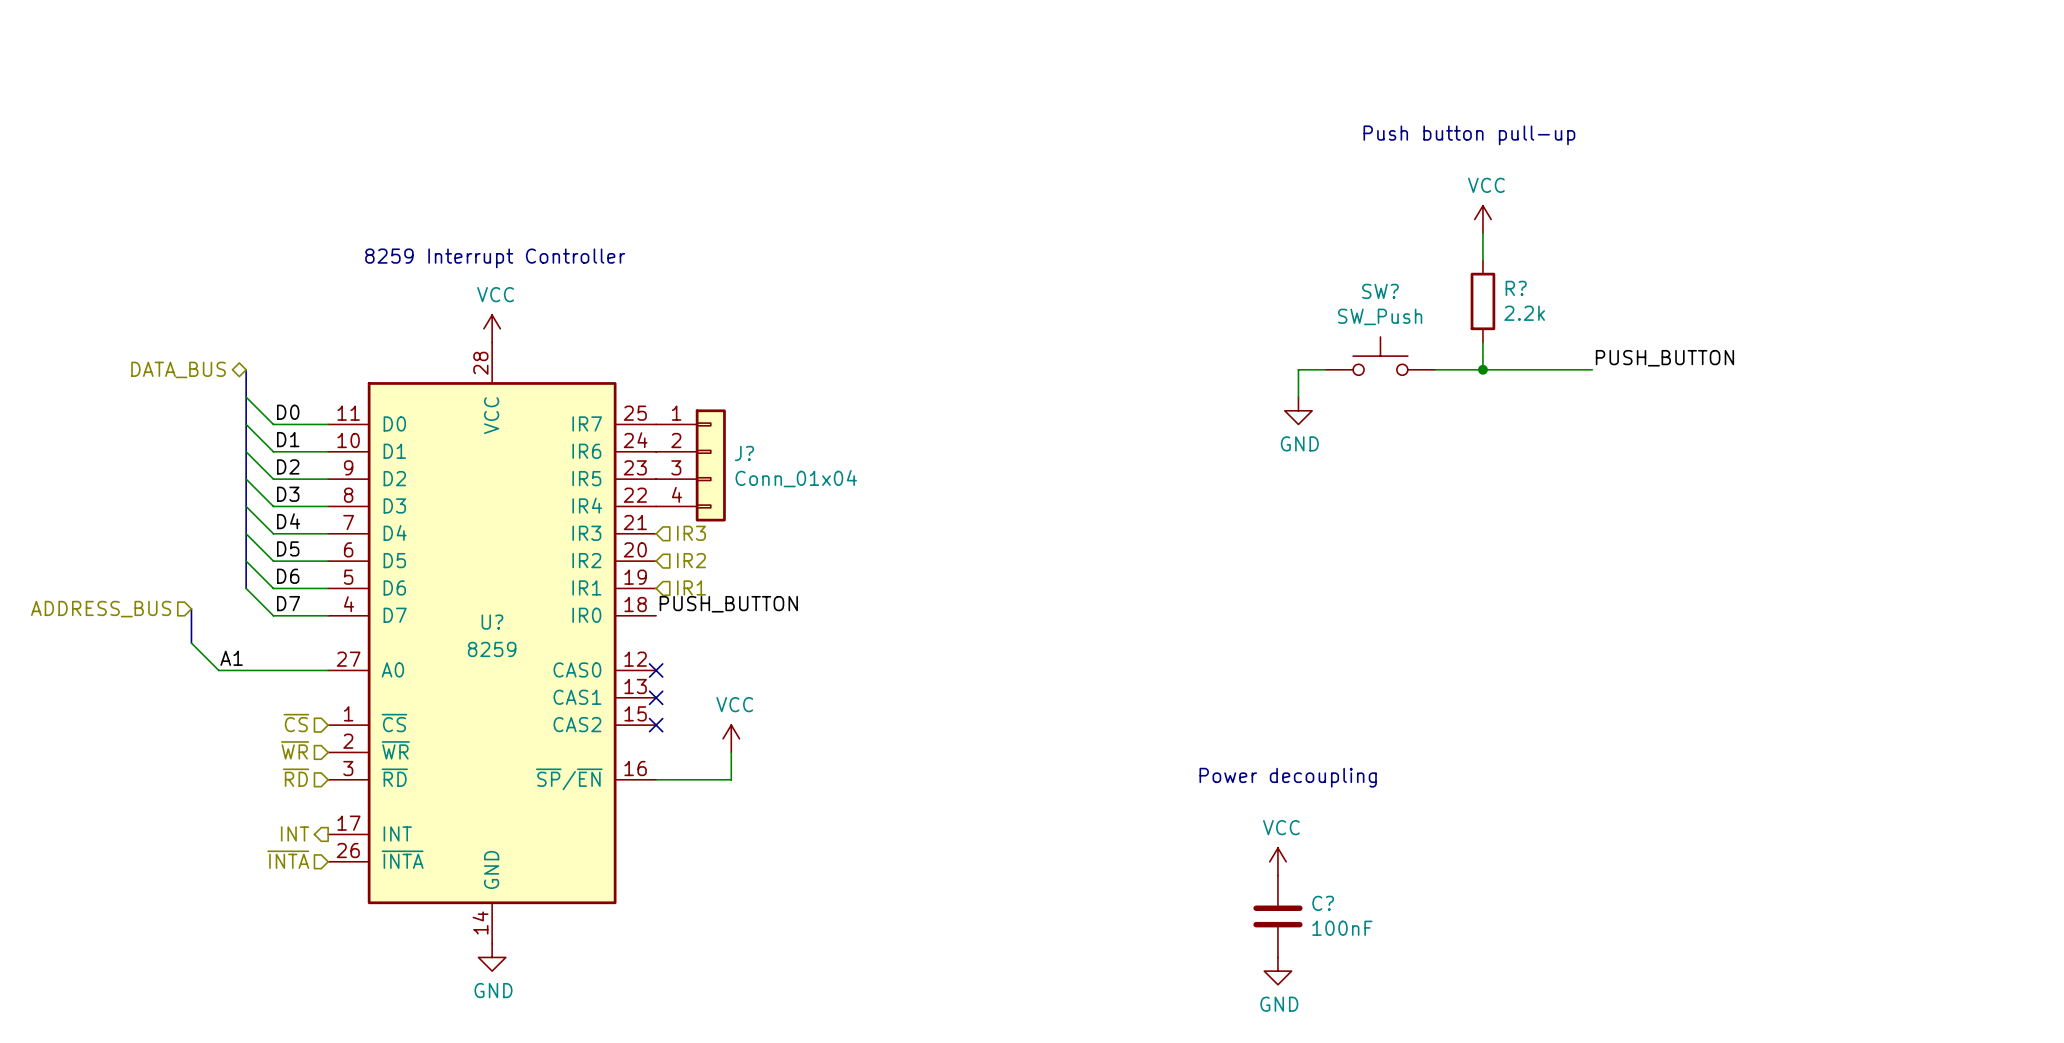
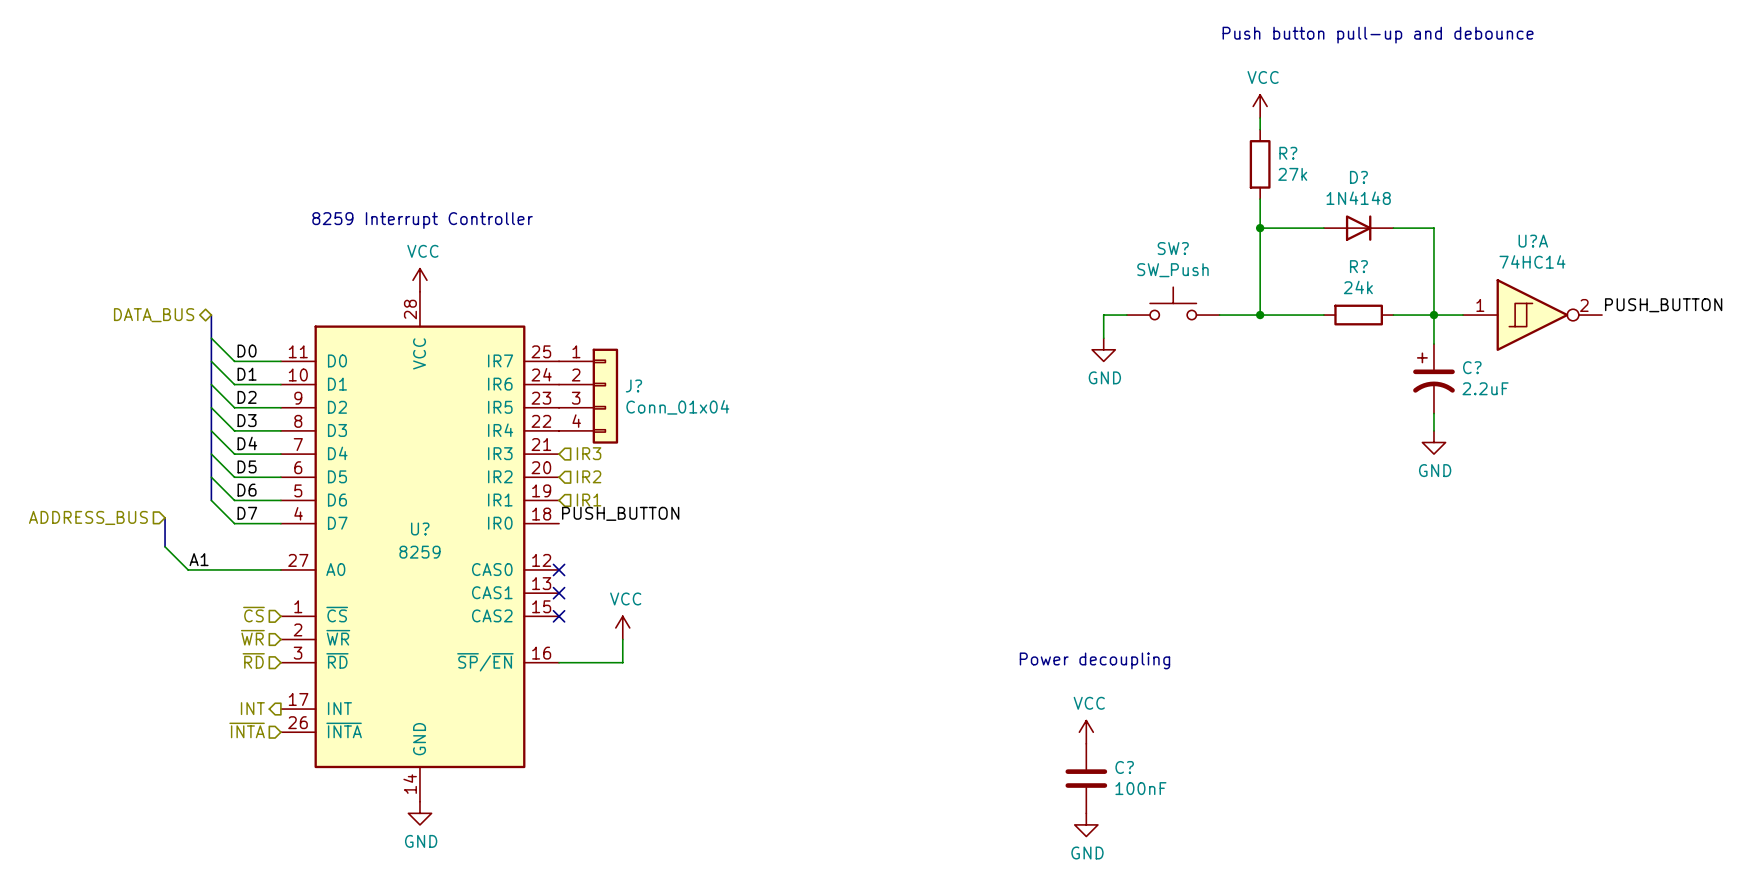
text: none -> Push button pull-up and debounce (1378, 35)
text: Push button pull-up (1469, 135) -> none
wire: none -> (1260, 118) (1260, 129)
R?: none -> 27k (1260, 164)
power symbol position: VCC (1482, 219) -> VCC (1260, 106)
wire: none -> (1260, 222) (1260, 291)
wire: none -> (1260, 228) (1323, 228)
junction: none -> (1260, 228)
D?: none -> 1N4148 (1358, 228)
wire: none -> (1393, 228) (1433, 228) (1433, 344)
R?: 2.2k (1482, 301) -> none
label: PUSH_BUTTON (1664, 358) -> none
label: none -> PUSH_BUTTON (1663, 305)
wire: (1558, 369) (1592, 369) -> none
R?: none -> 24k (1358, 315)
wire: none -> (1393, 315) (1462, 315)
junction: none -> (1433, 315)
U?A: none -> 74HC14 (1532, 315)
C?: none -> 2.2uF (1433, 378)
wire: none -> (1433, 413) (1433, 430)
power symbol: none -> GND (1433, 442)

